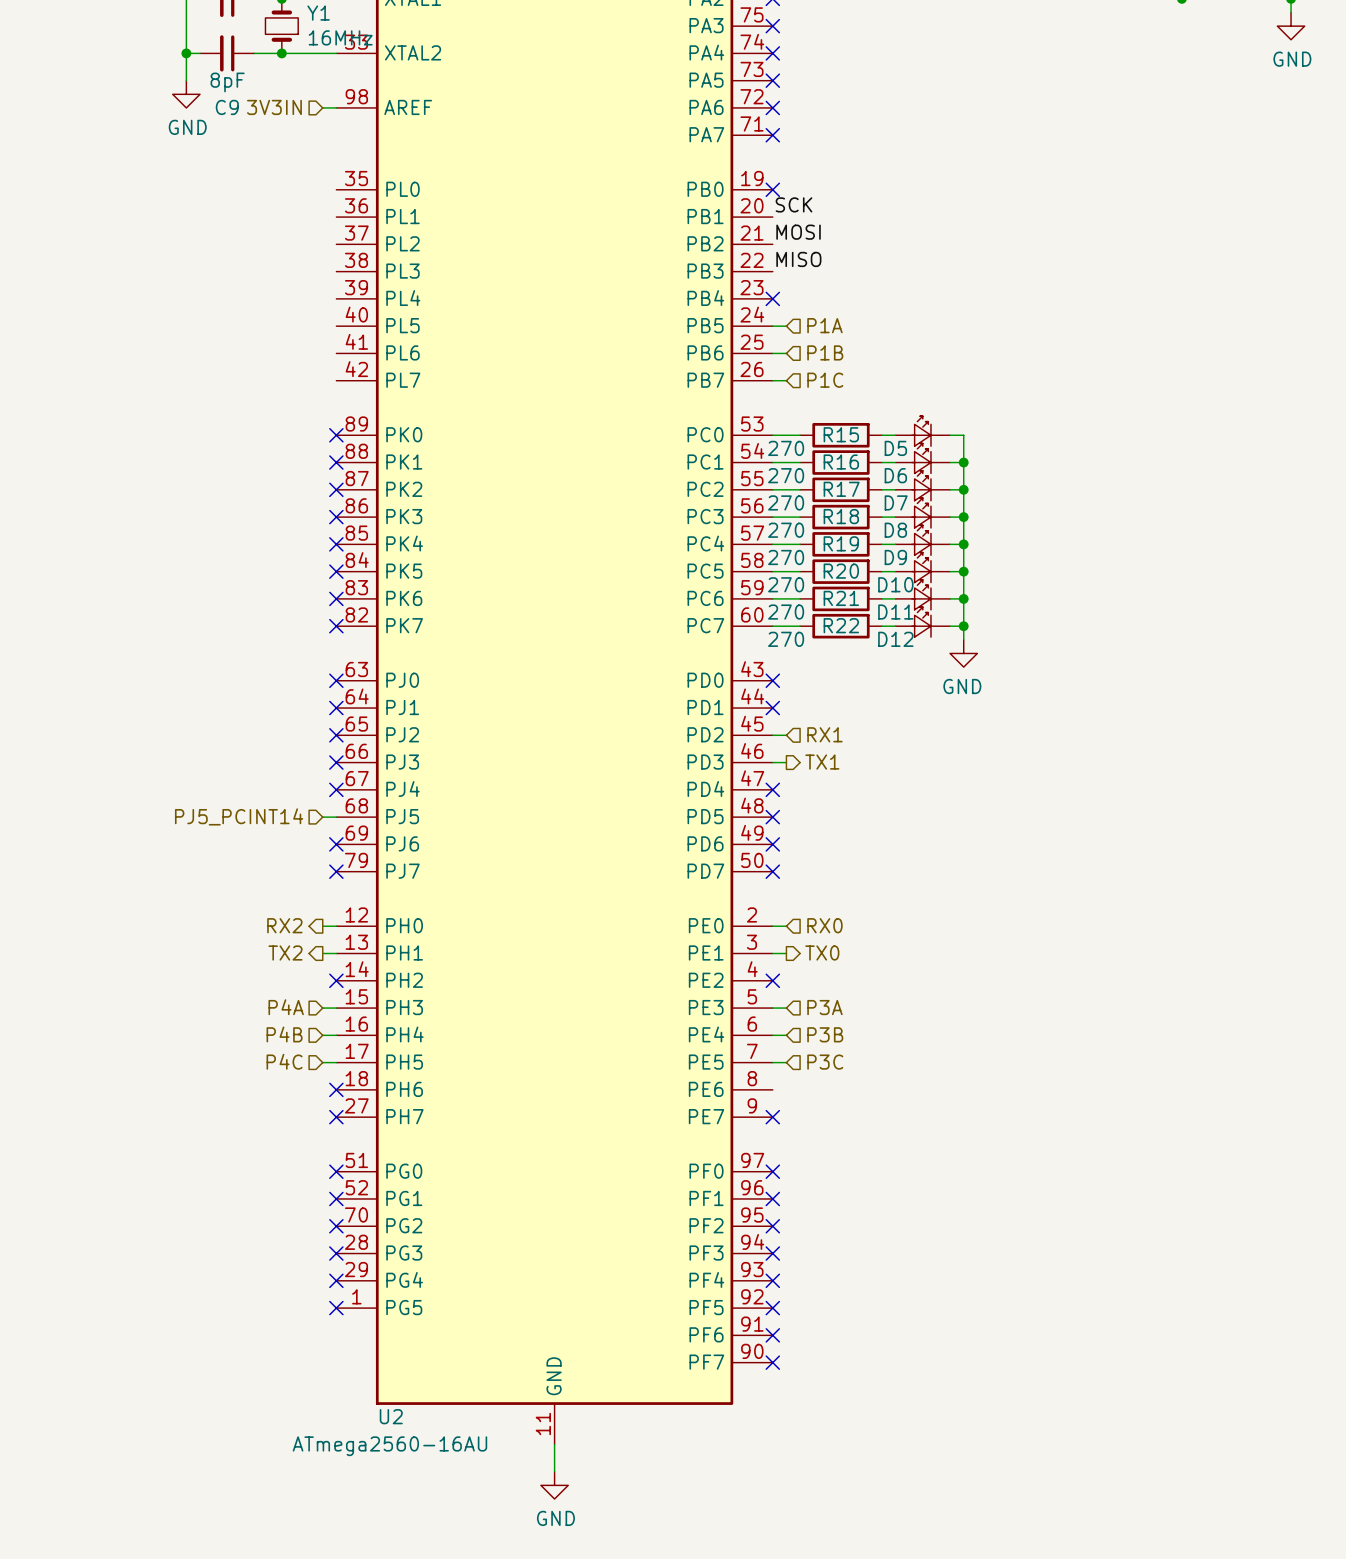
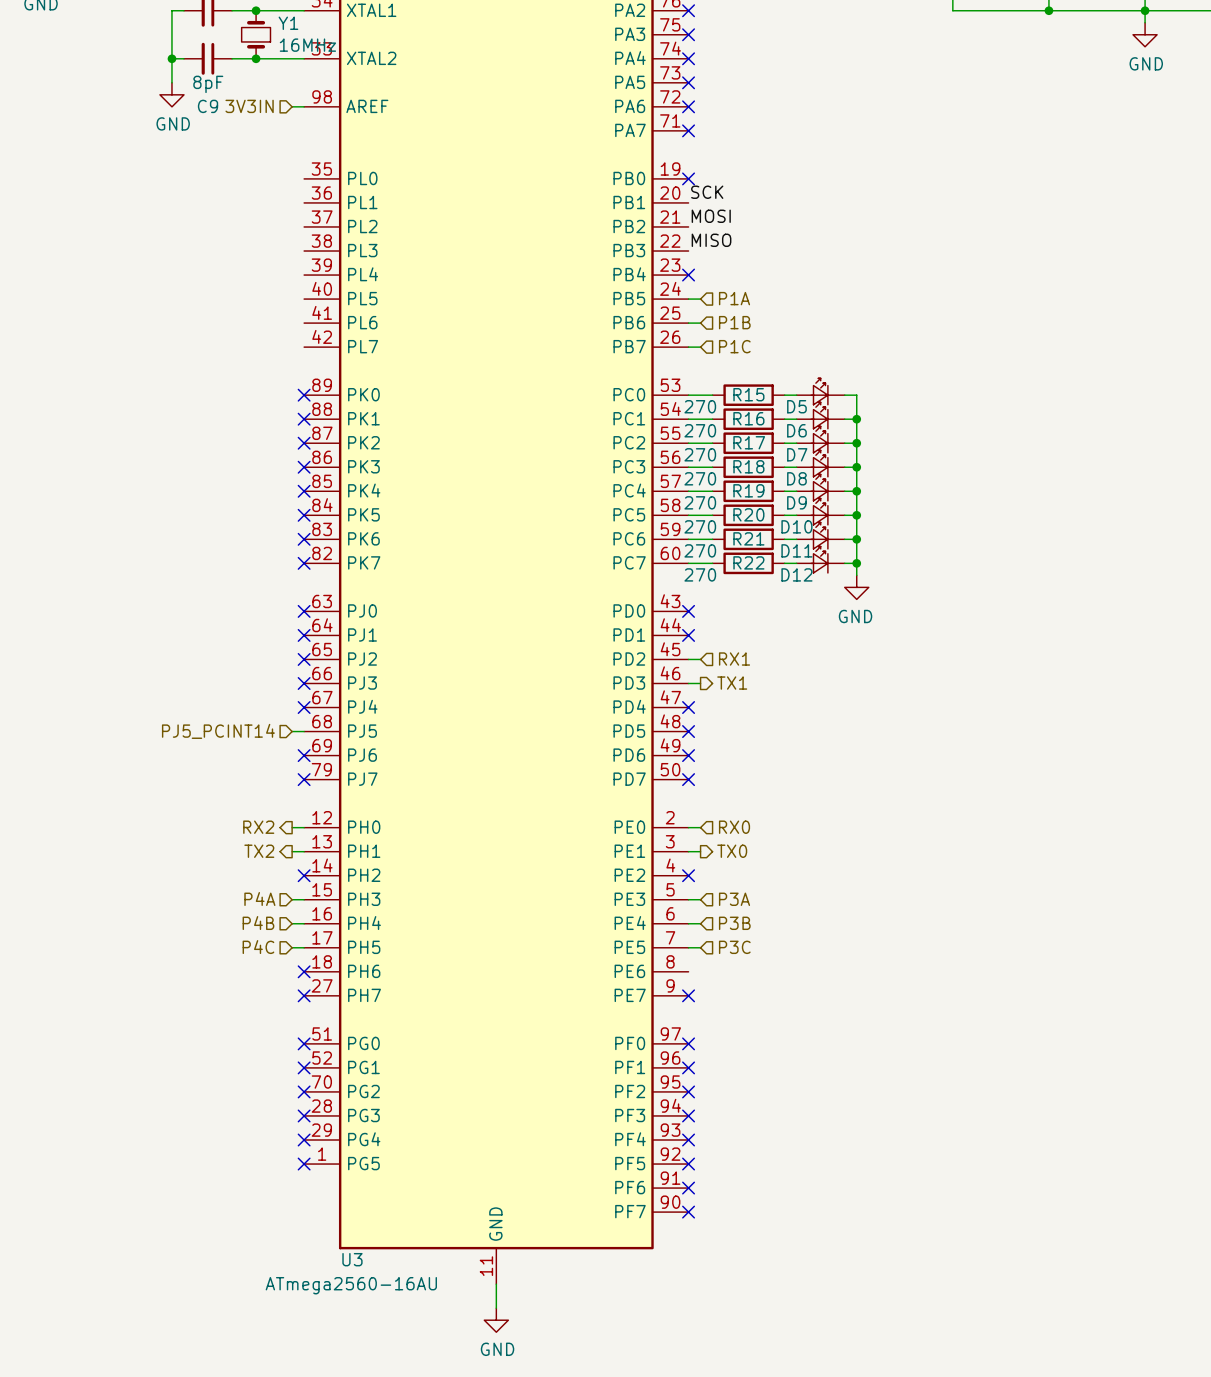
U2 name: U2 (391, 1416) -> U3 (352, 1259)

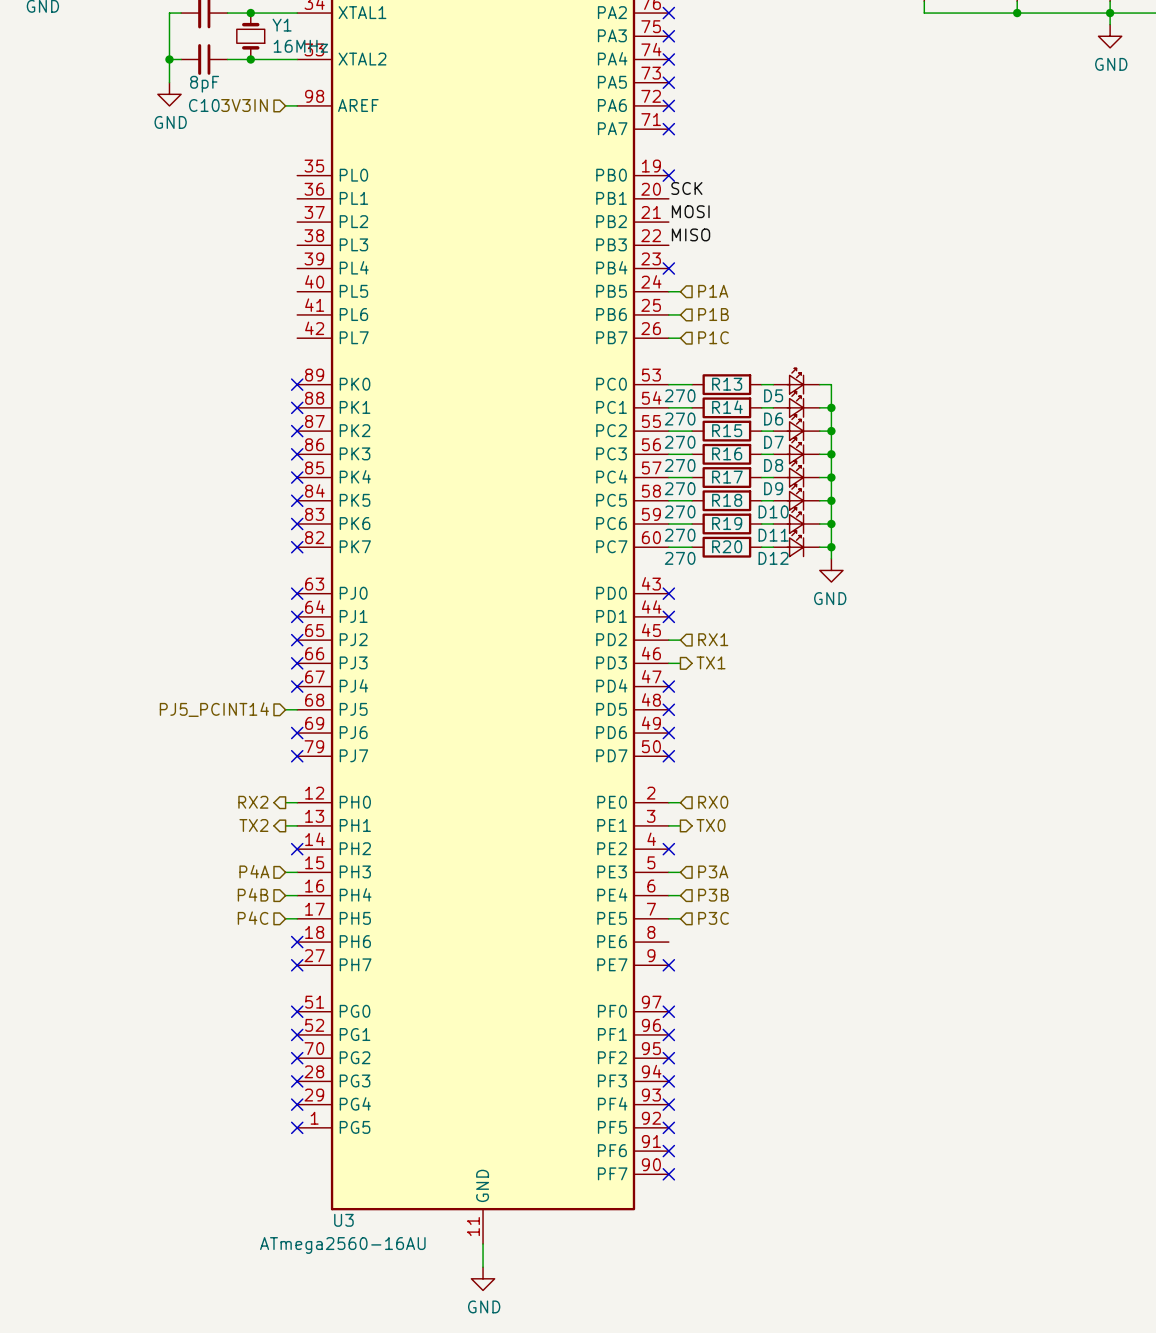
C9 name: C9 (208, 106) -> C10 (204, 105)
R15 name: R15 (748, 394) -> R13 (727, 384)
R16 name: R16 (748, 418) -> R14 (727, 407)
R17 name: R17 (749, 442) -> R15 (727, 430)
R18 name: R18 (748, 466) -> R16 (727, 453)
R19 name: R19 (748, 490) -> R17 (727, 477)
R20 name: R20 (748, 514) -> R18 (727, 500)
R21 name: R21 (748, 538) -> R19 (727, 523)
R22 name: R22 (748, 562) -> R20 (727, 546)

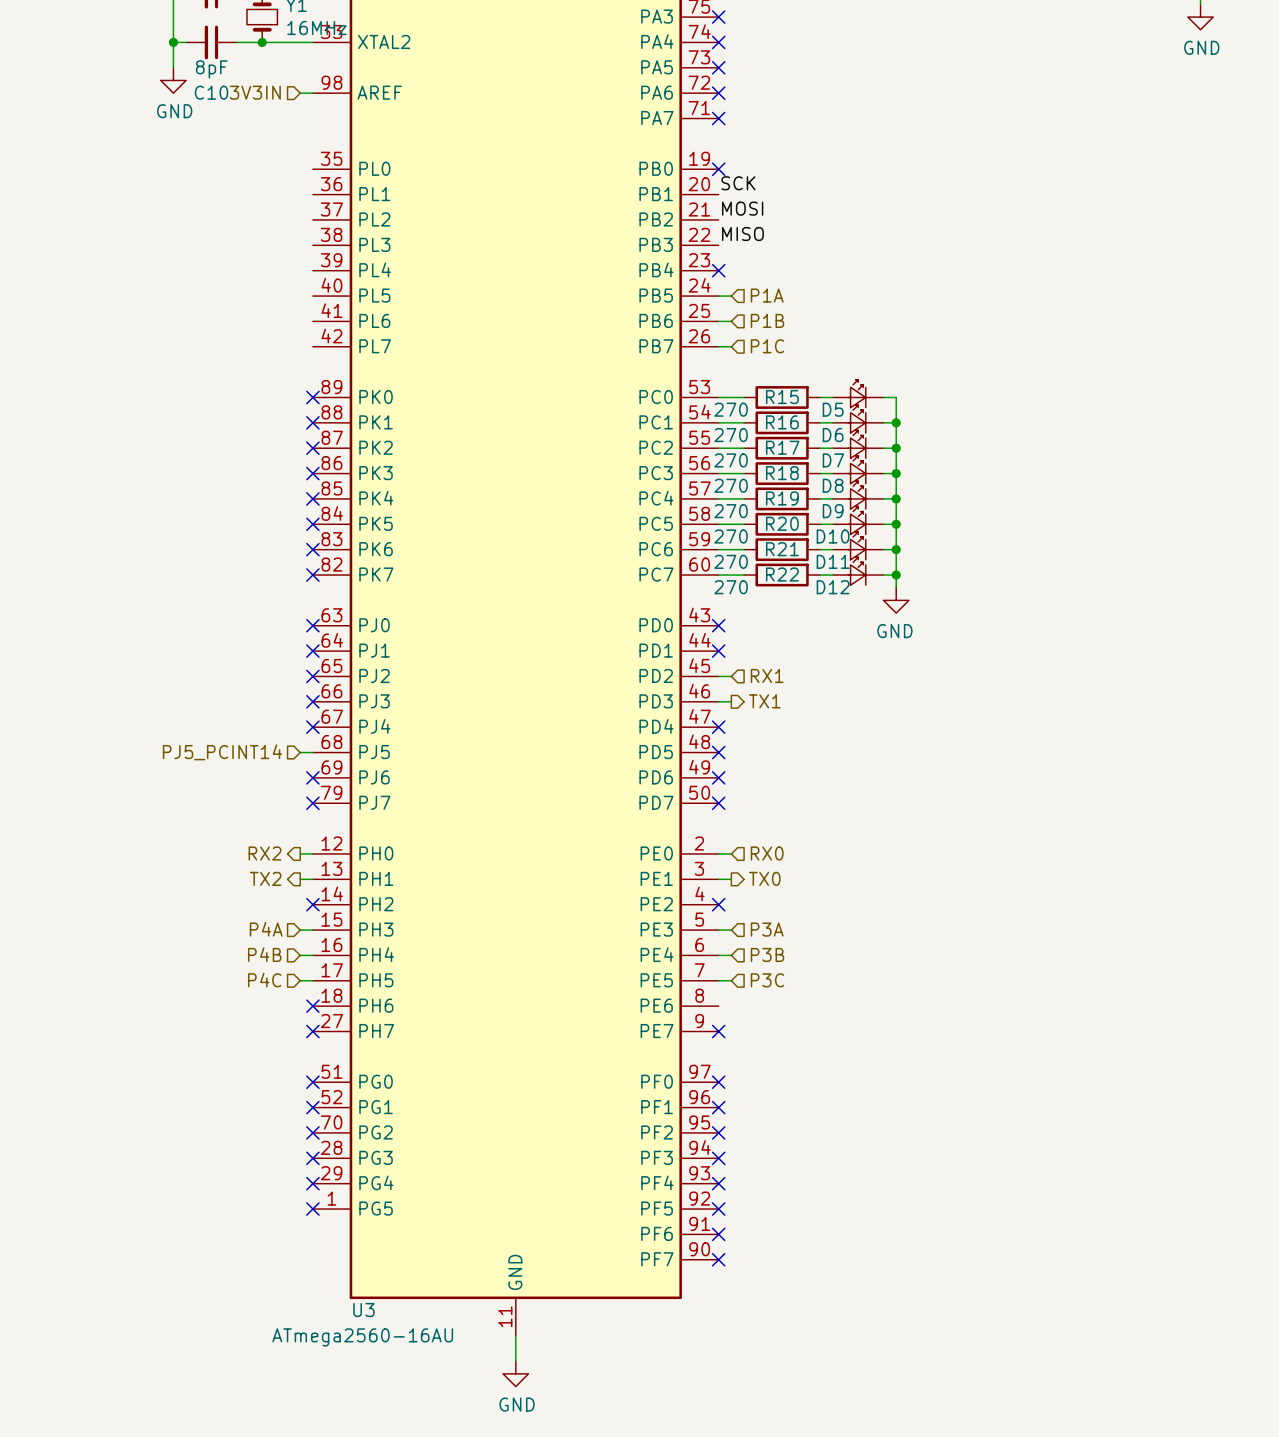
R13 name: R13 (727, 384) -> R15 (782, 397)
R14 name: R14 (727, 407) -> R16 (782, 422)
R15 name: R15 (727, 430) -> R17 (782, 447)
R16 name: R16 (727, 453) -> R18 (782, 473)
R17 name: R17 (727, 477) -> R19 (782, 498)
R18 name: R18 (727, 500) -> R20 (782, 523)
R19 name: R19 (727, 523) -> R21 (782, 549)
R20 name: R20 (727, 546) -> R22 (782, 574)

